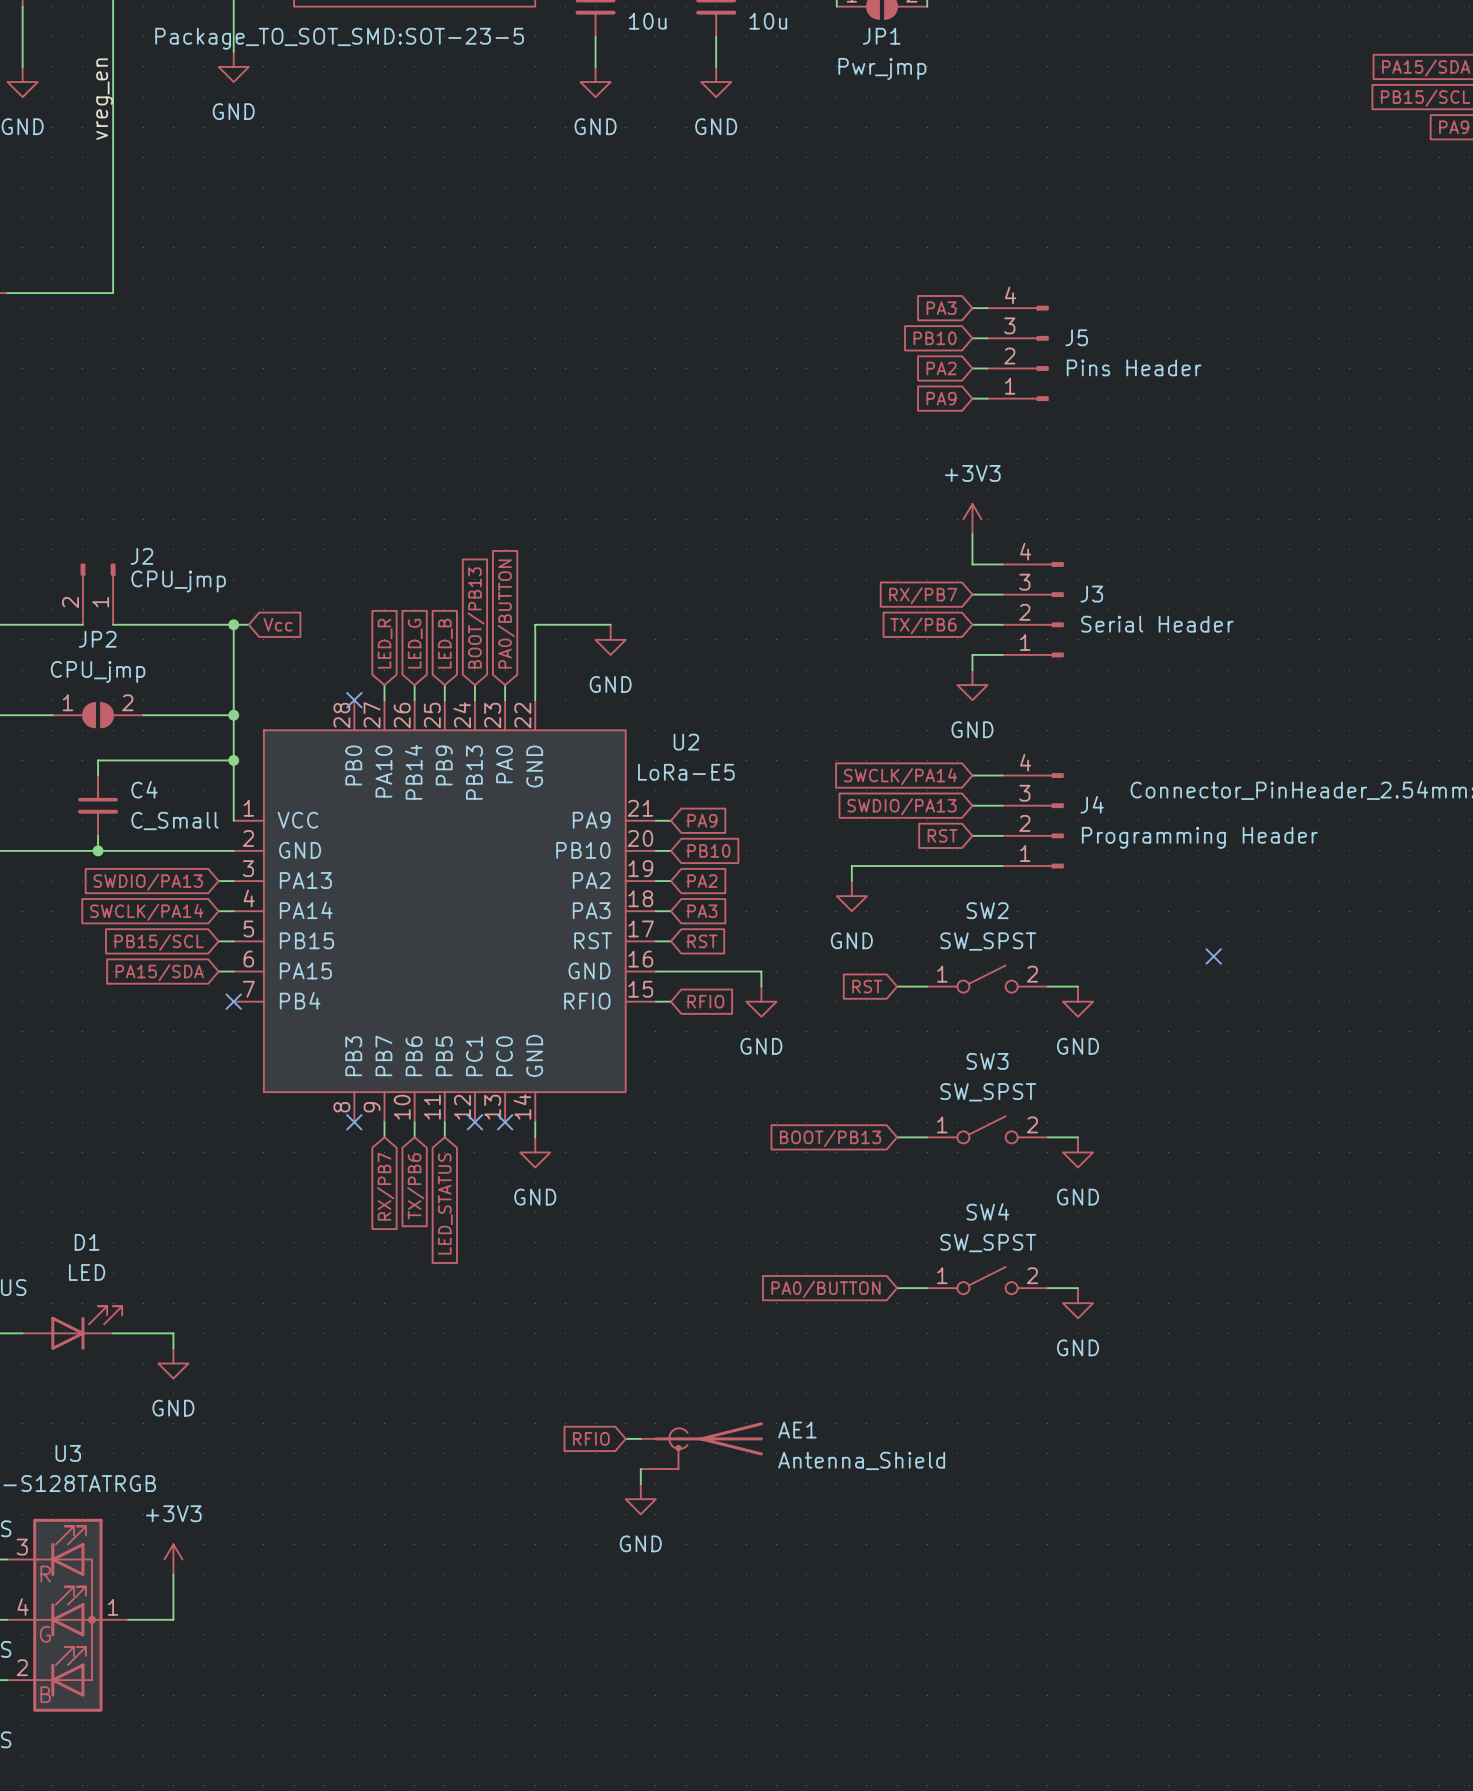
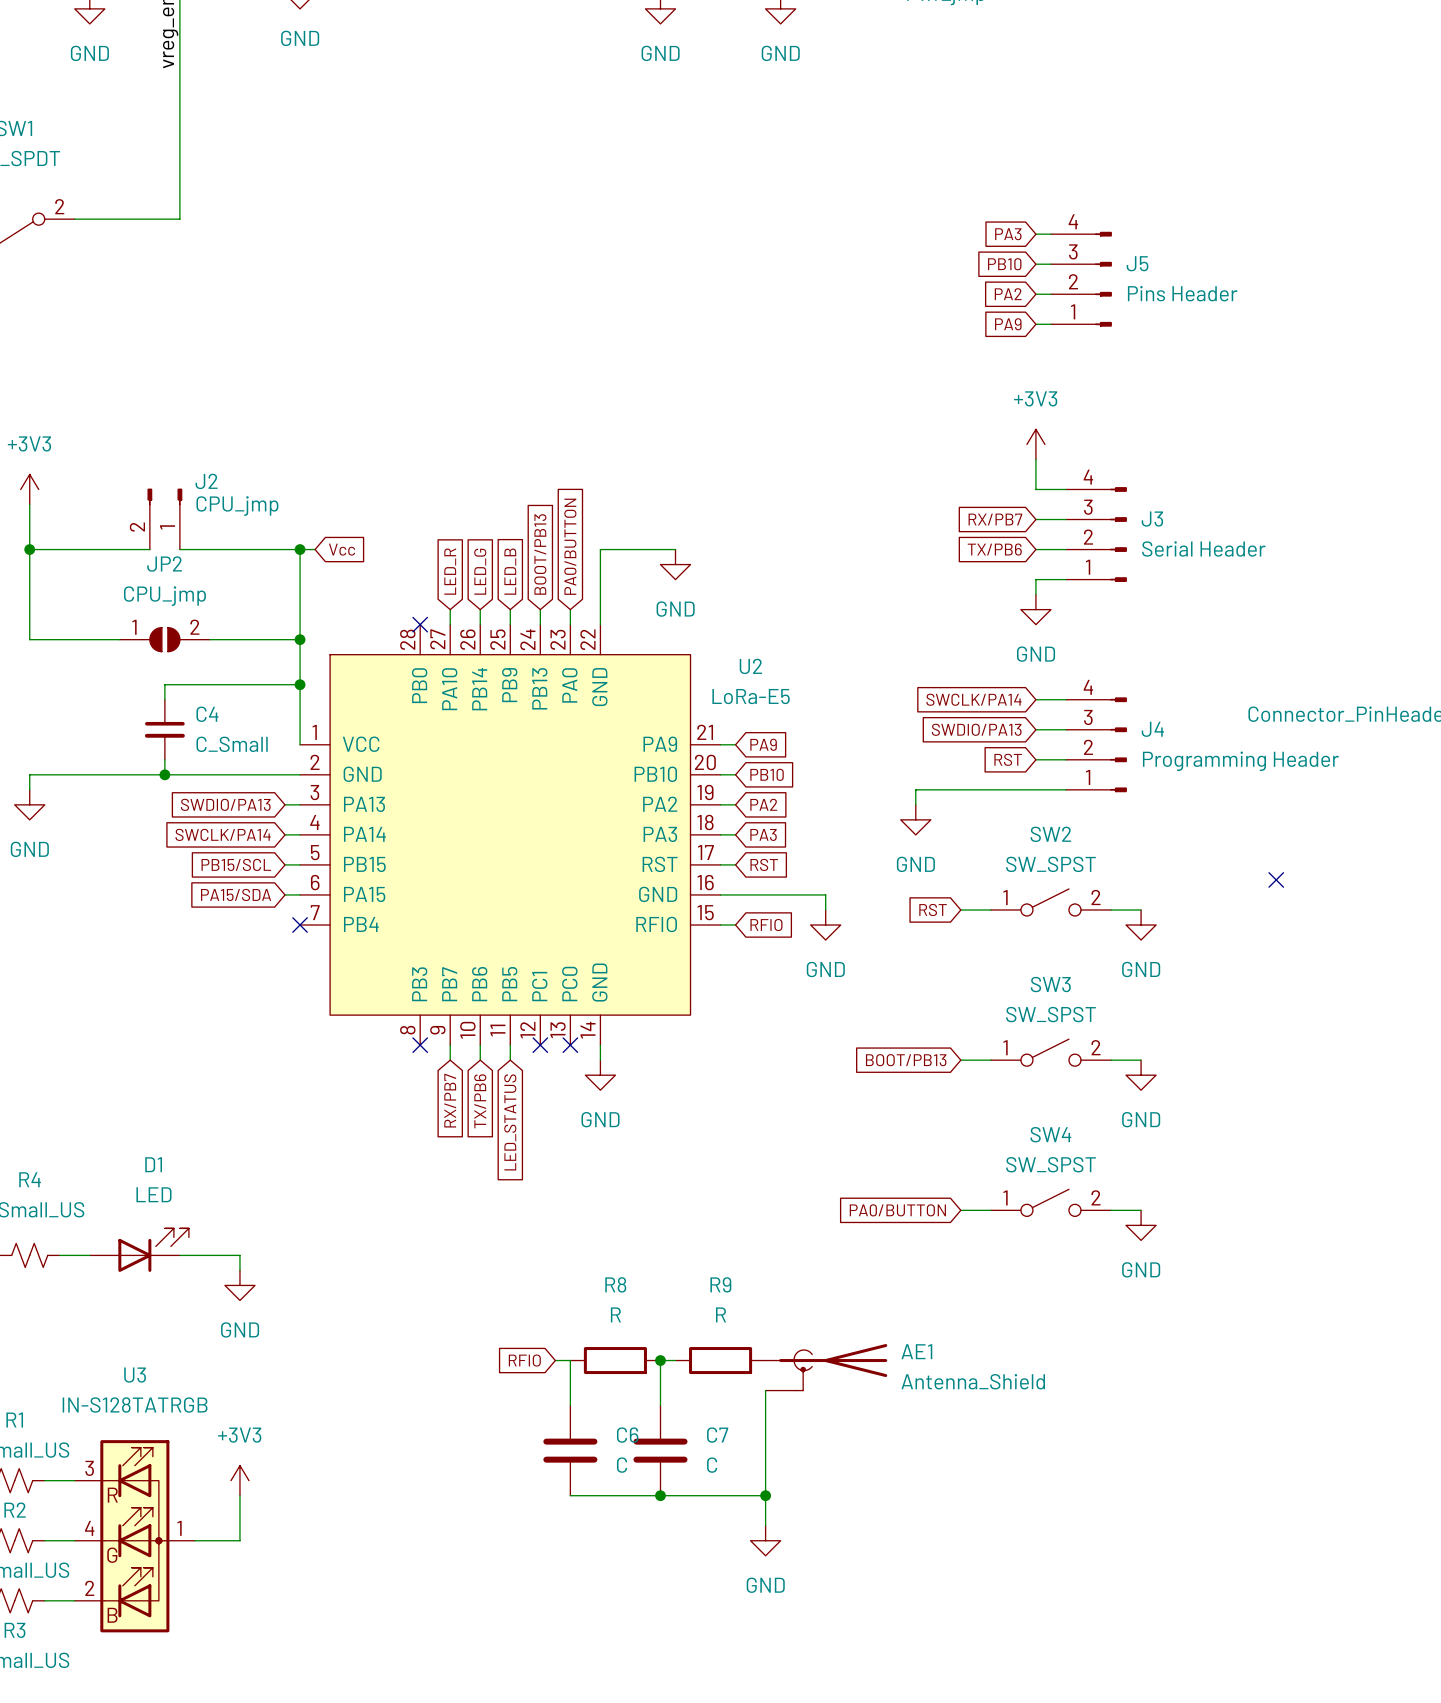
wire: none -> (555, 1360) (570, 1360) (570, 1405)
R8: none -> R (615, 1360)
global label position: RFIO (591, 1438) -> RFIO (524, 1360)
junction: none -> (660, 1360)
wire: none -> (675, 1360) (660, 1360) (660, 1405)
wire: (625, 1438) (640, 1438) -> none
R9: none -> R (720, 1360)
AE1 position: (701, 1445) -> (826, 1367)
wire: (640, 1469) (640, 1484) -> none
wire: none -> (765, 1390) (765, 1525)
power symbol position: GND (640, 1499) -> GND (765, 1540)
C6: none -> C (570, 1450)
C7: none -> C (660, 1450)
wire: none -> (570, 1495) (765, 1495)
junction: none -> (660, 1495)
junction: none -> (765, 1495)

